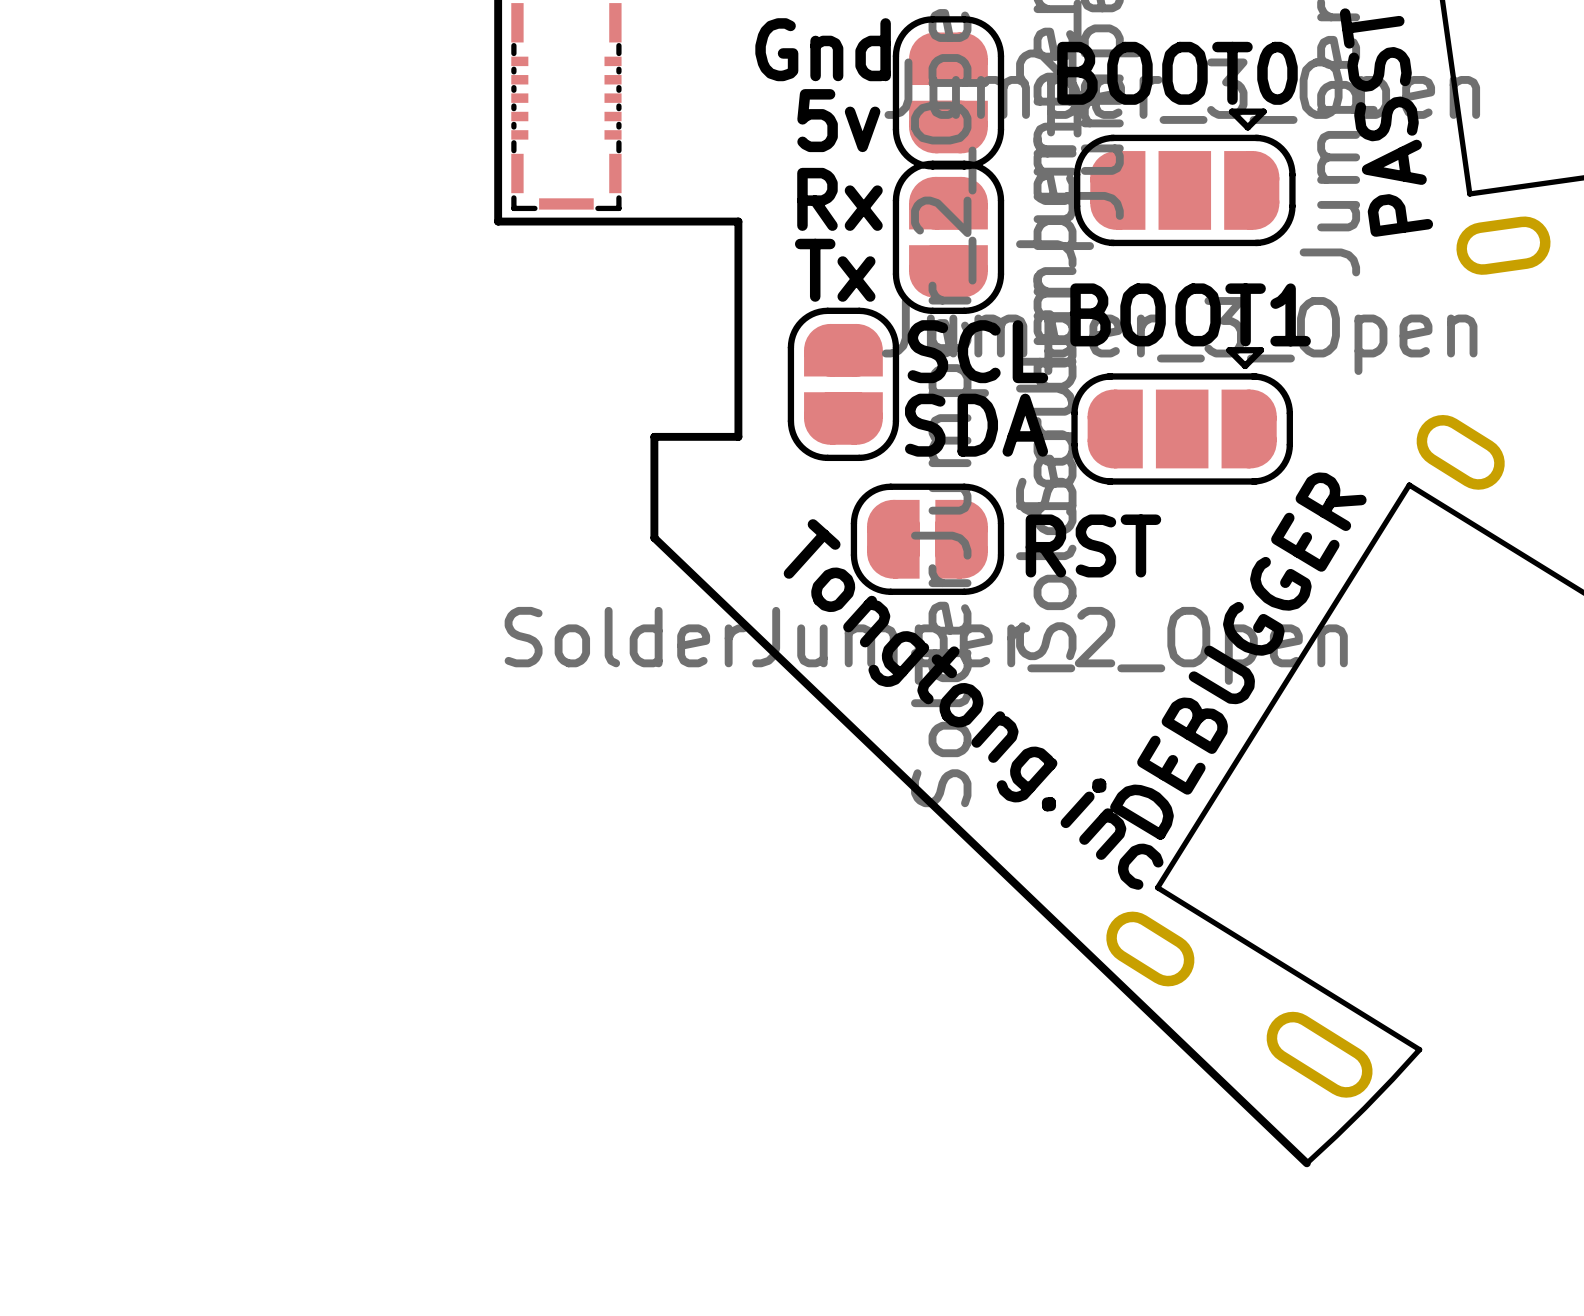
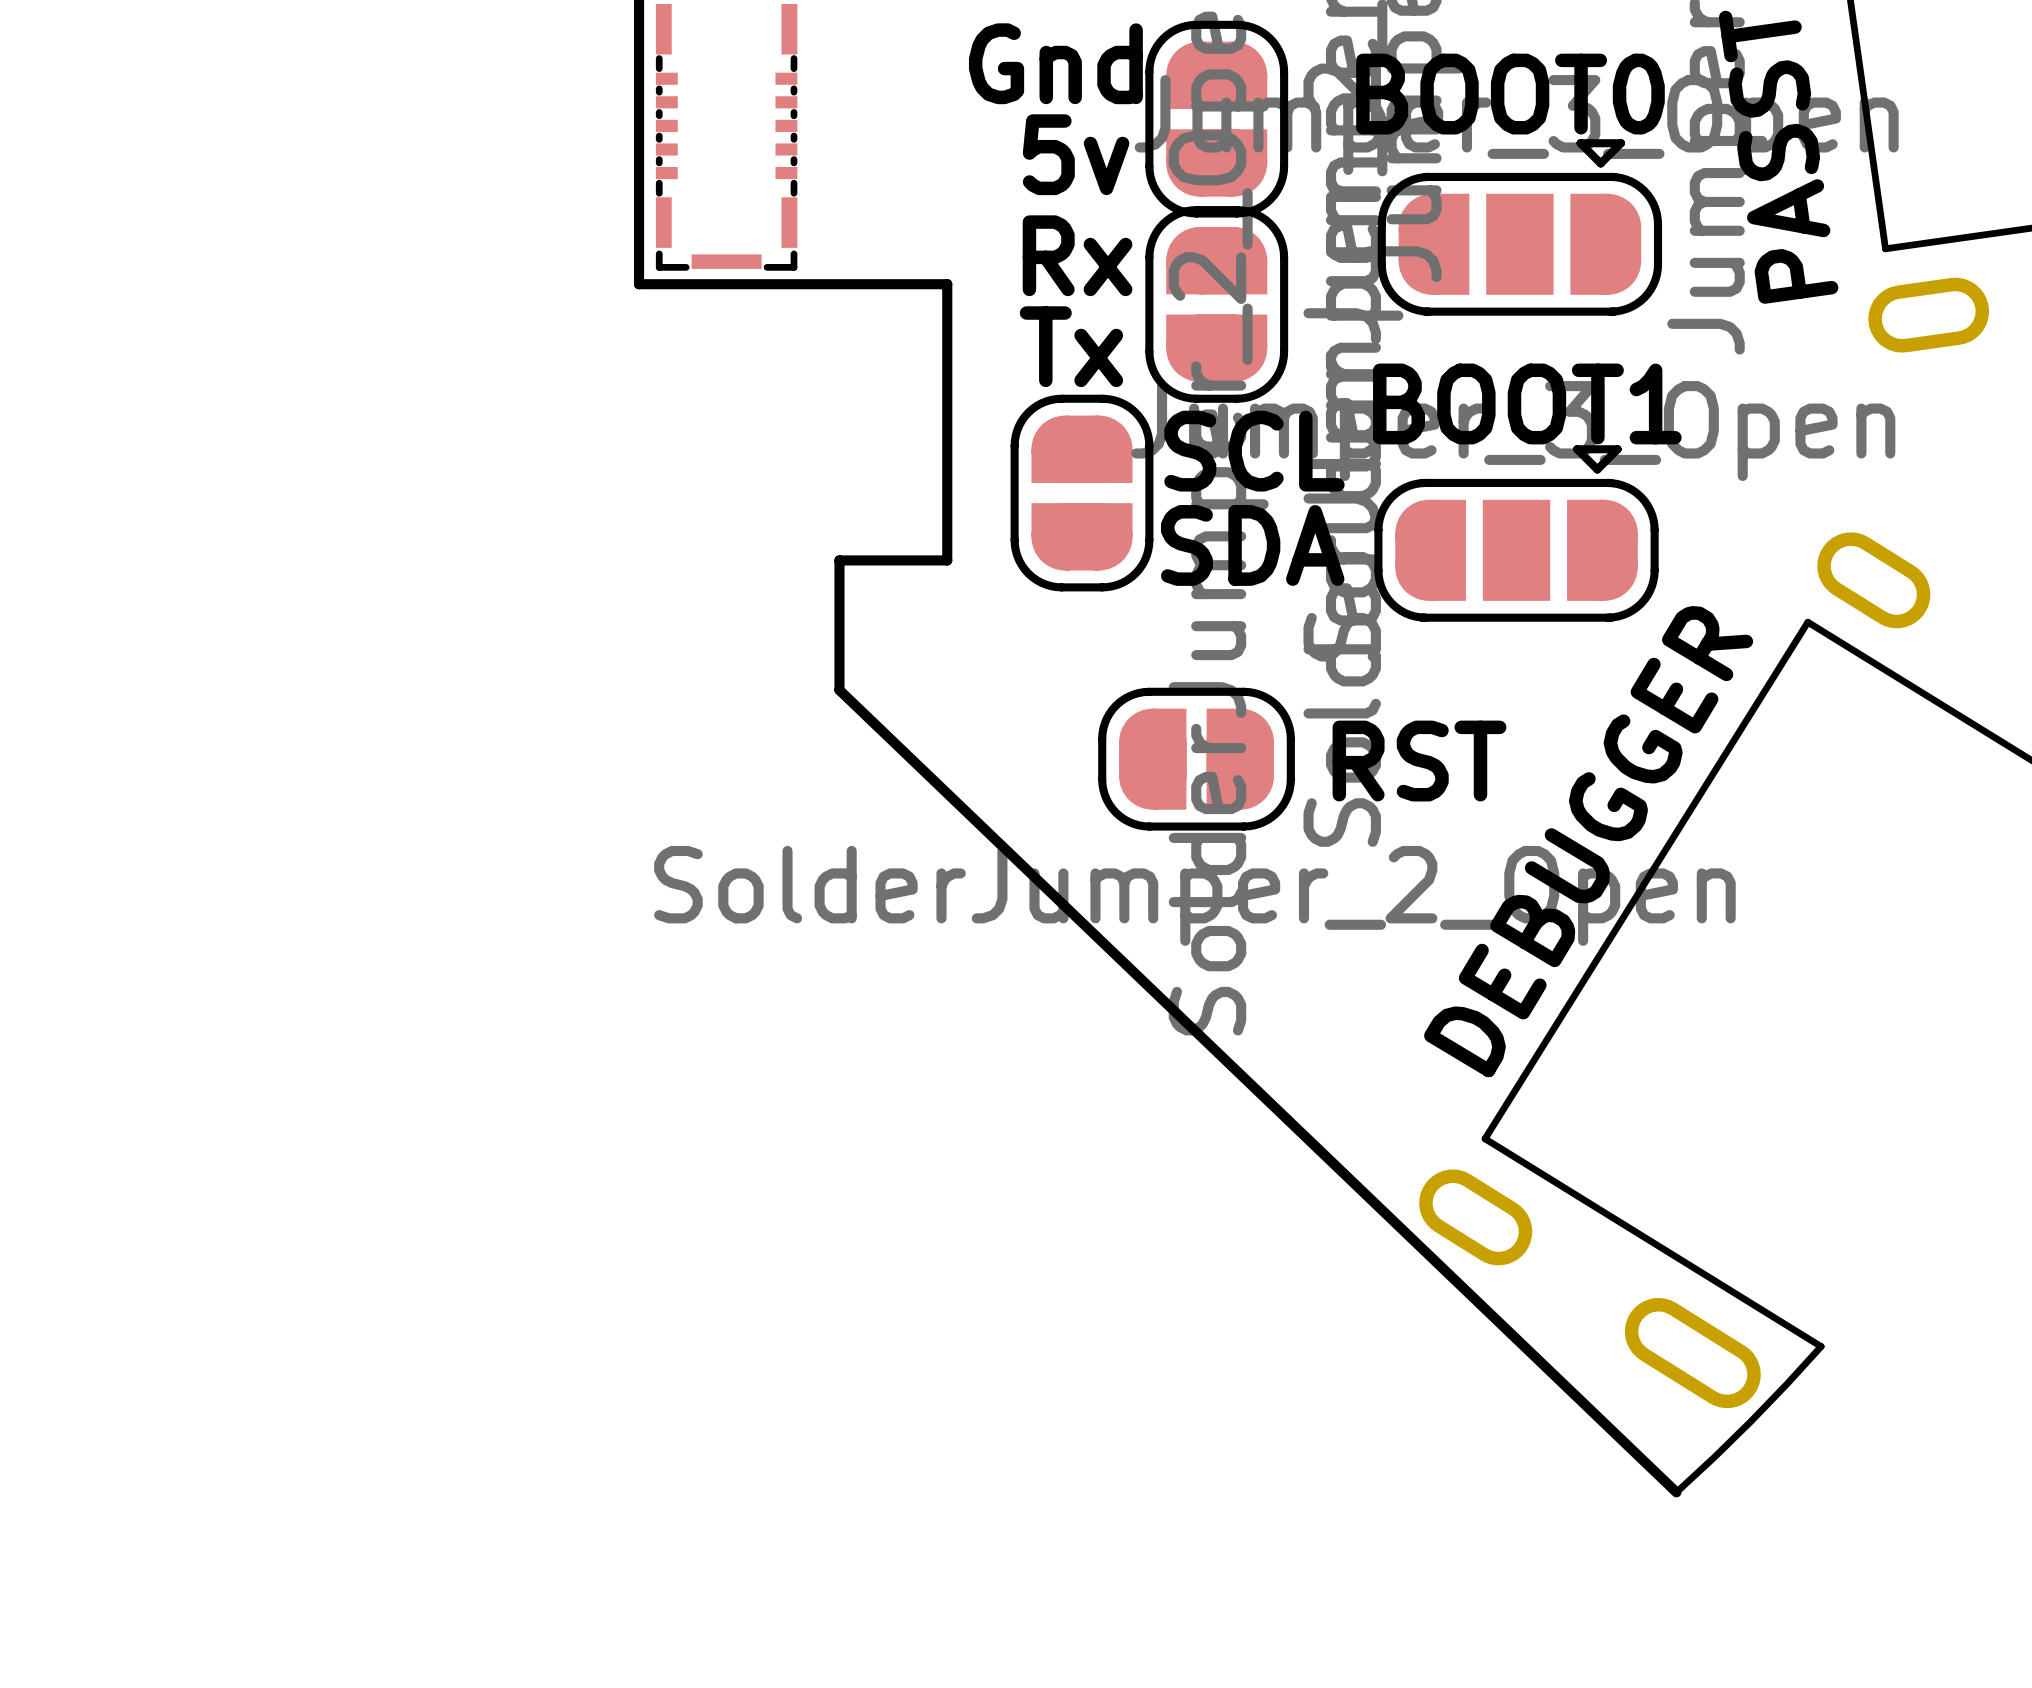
part position: (927, 539) -> (1196, 759)
text position: RST (1093, 545) -> RST (1419, 761)
text: Tongtong.inc (973, 704) -> none

